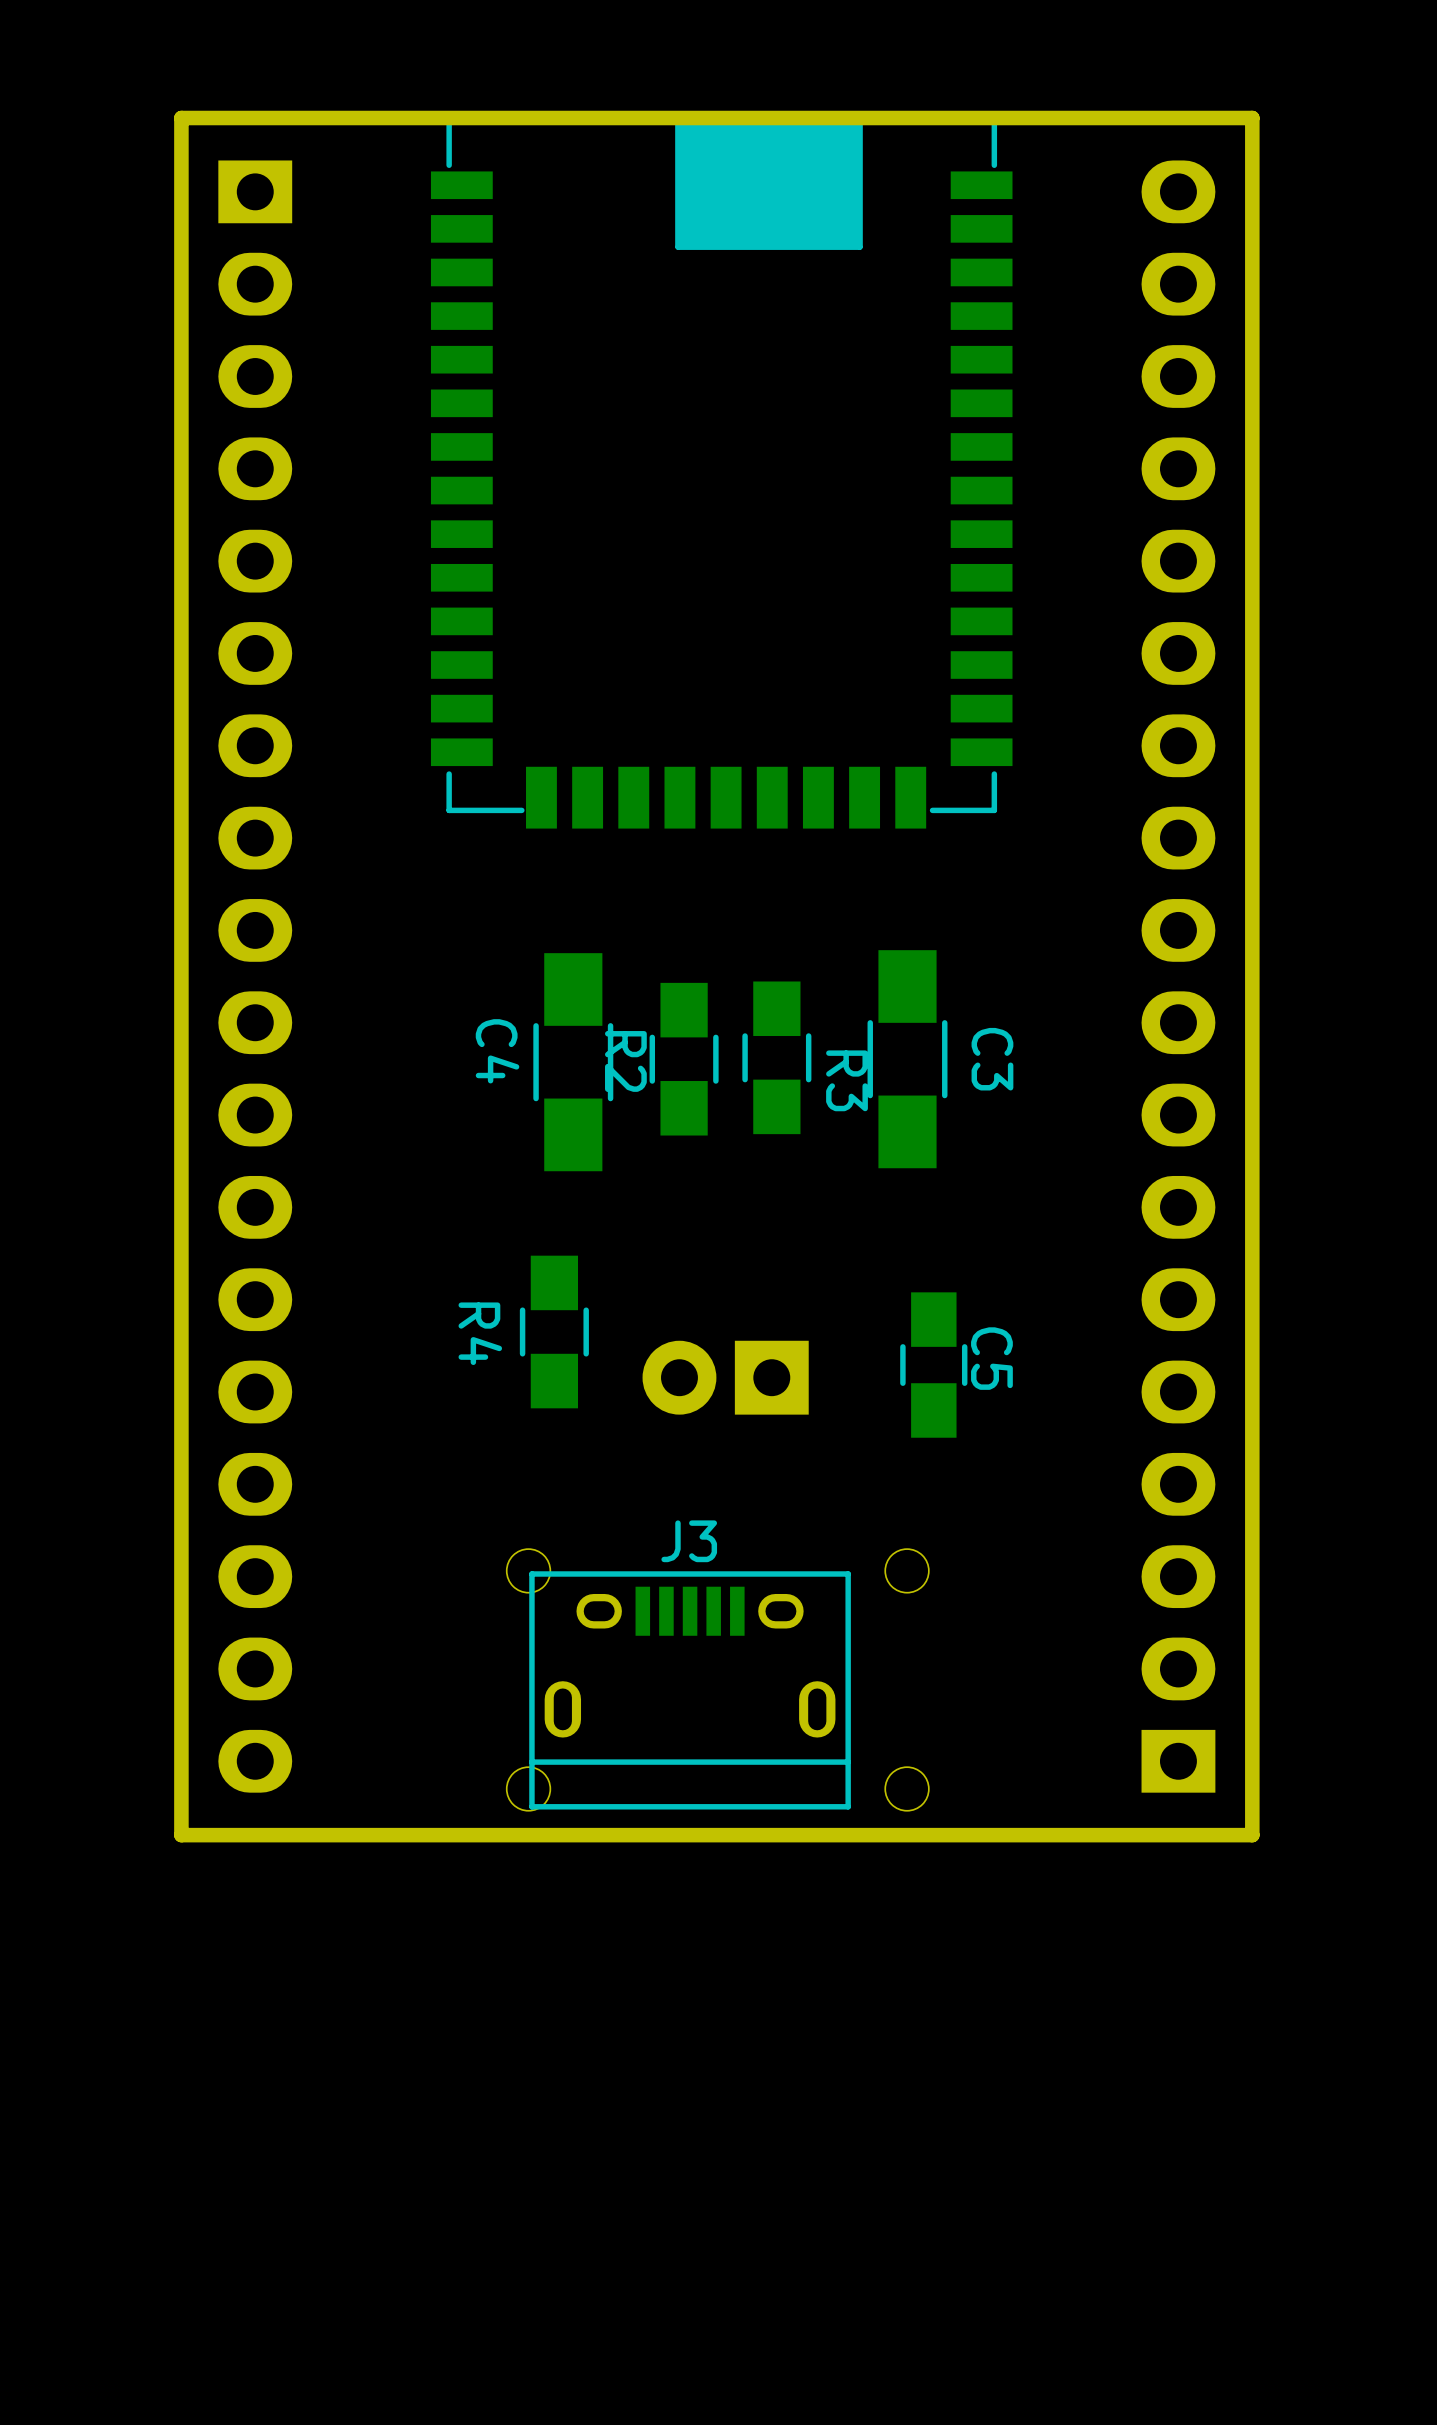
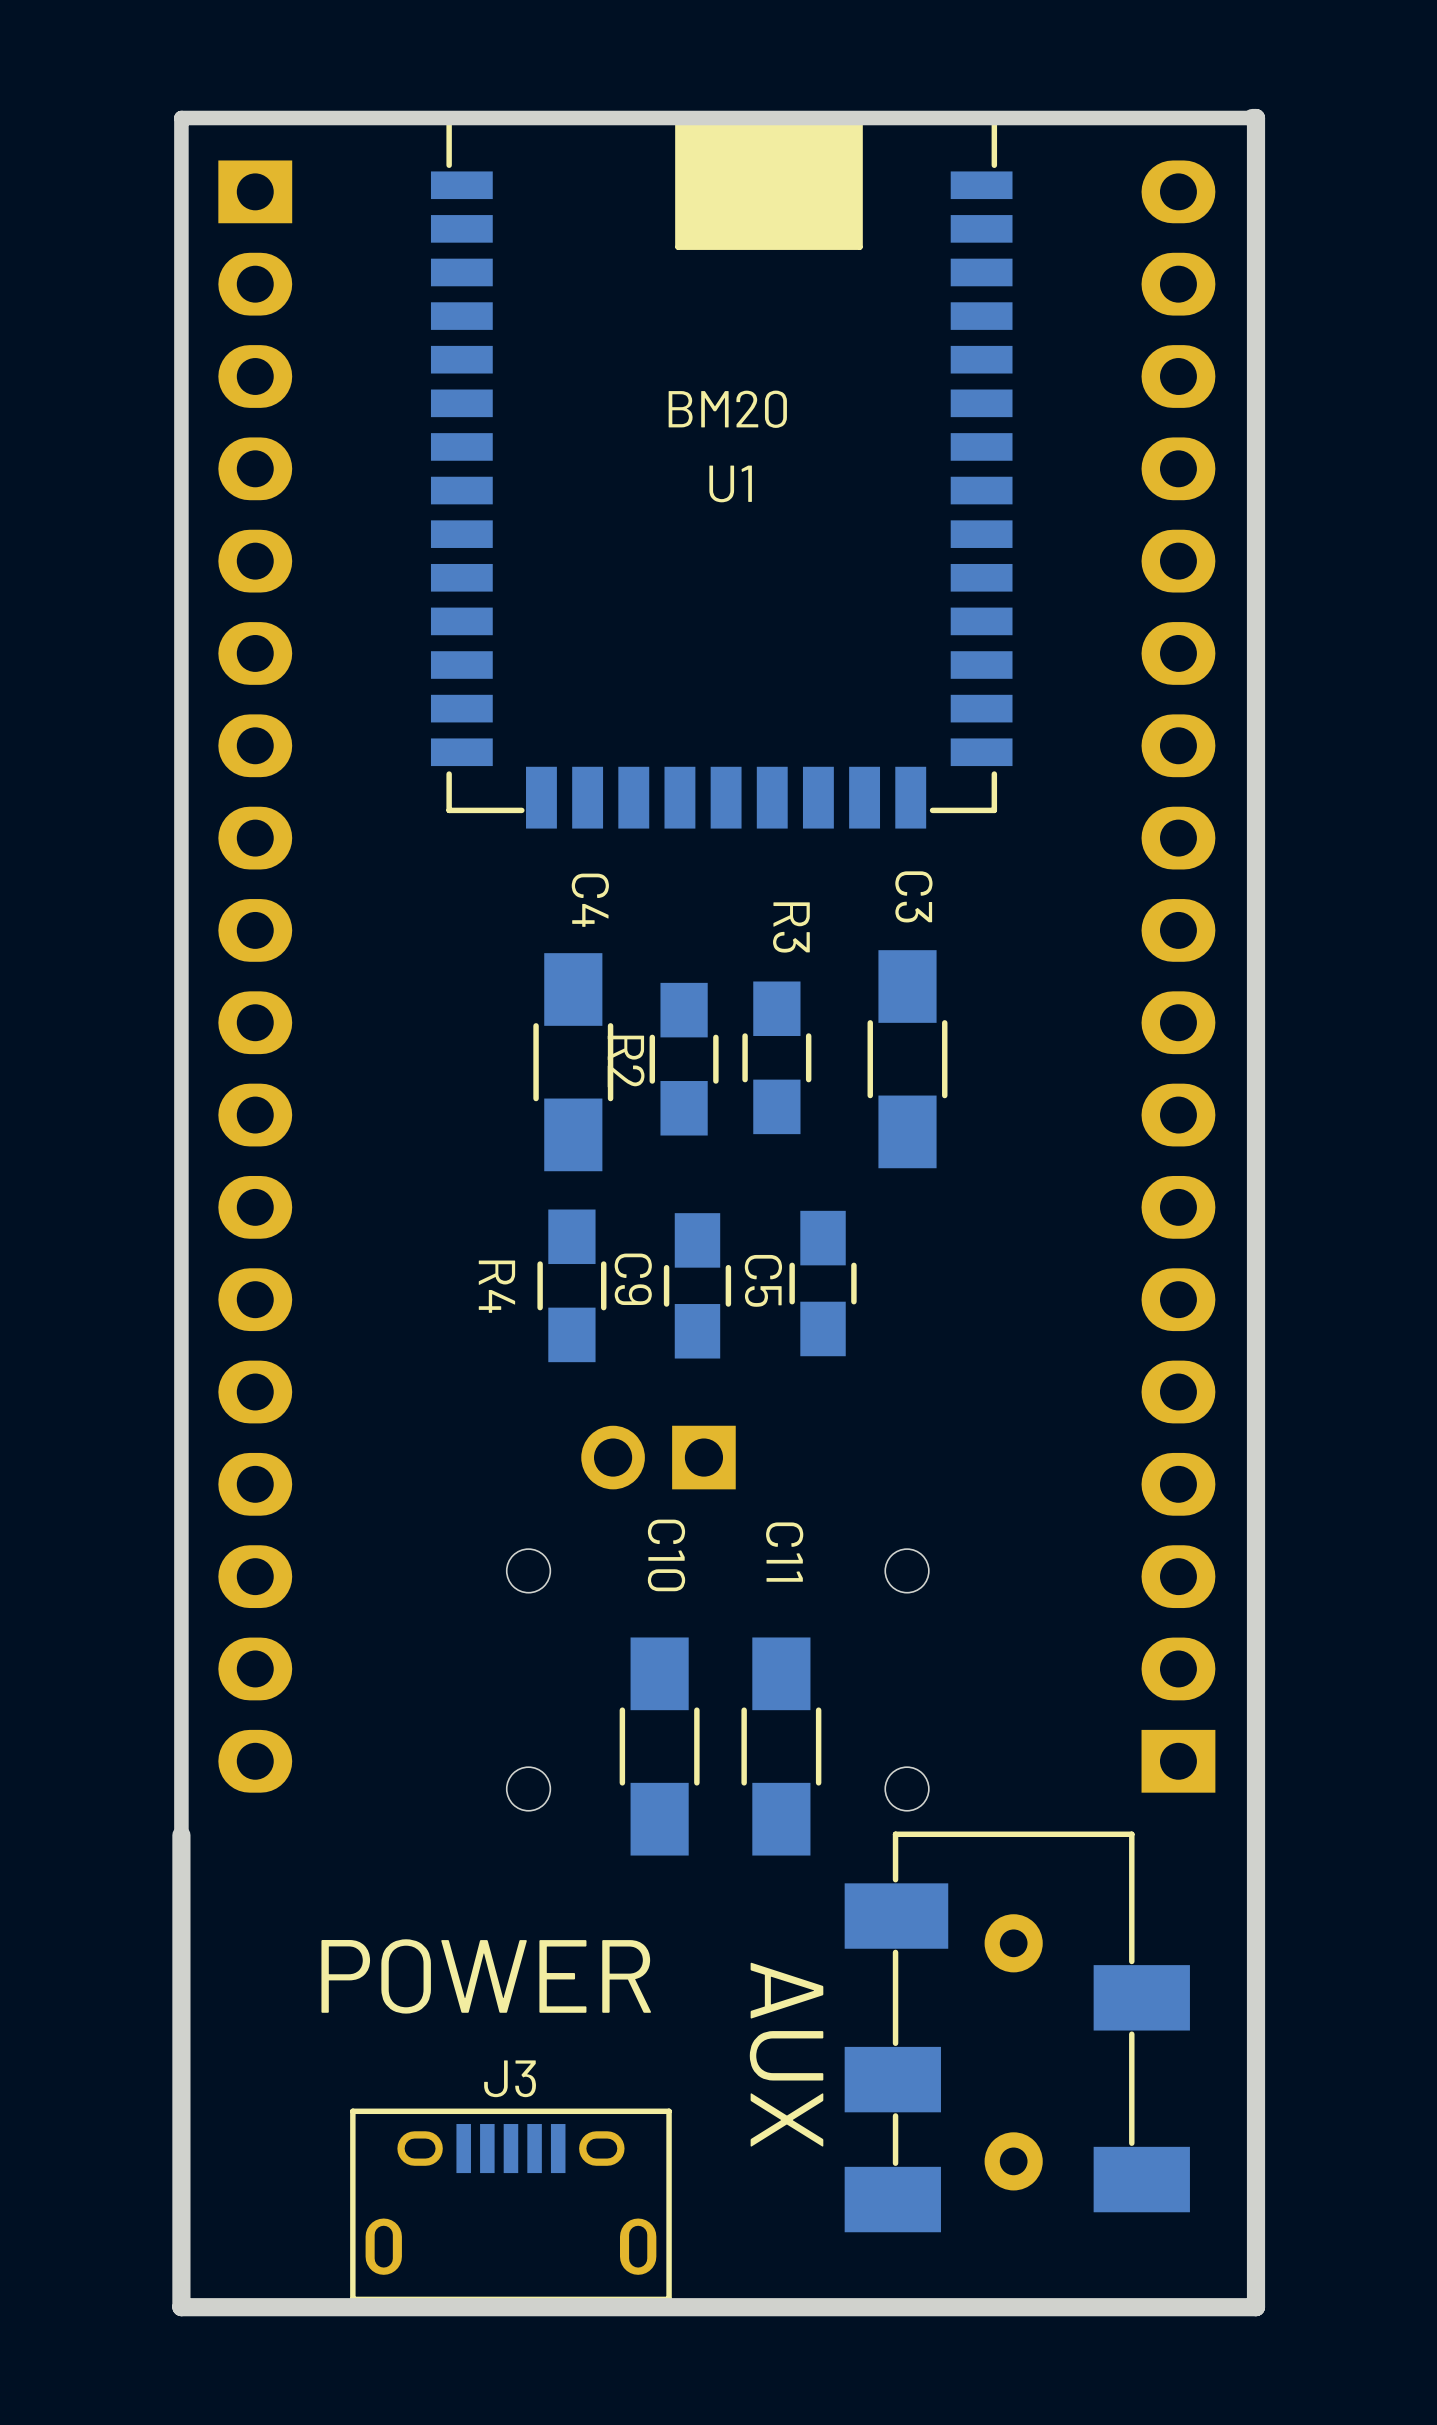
board edge: (1252, 118) (1252, 1835) (181, 1835) -> (1252, 118) (1256, 118) (1256, 2307) (181, 2307) (181, 1835)
U1 value: none -> BM20 (727, 409)
U1 name: none -> U1 (730, 483)
C4 name position: C4 (497, 1051) -> C4 (590, 900)
C3 name position: C3 (992, 1059) -> C3 (913, 896)
R3 name position: R3 (847, 1080) -> R3 (791, 927)
C9: none -> (697, 1285)
R4 position: (554, 1332) -> (571, 1285)
C5 name position: C5 (991, 1358) -> C5 (763, 1280)
C5 position: (933, 1365) -> (823, 1283)
part: (725, 1377) -> none
part: none -> (658, 1457)
J3 footprint: [529, 1571, 851, 1810] -> [350, 2108, 672, 2303]
C10: none -> (659, 1746)
C11: none -> (781, 1746)
text: none -> POWER (486, 1976)
part: none -> (1017, 2031)
text: none -> AUX (786, 2054)

